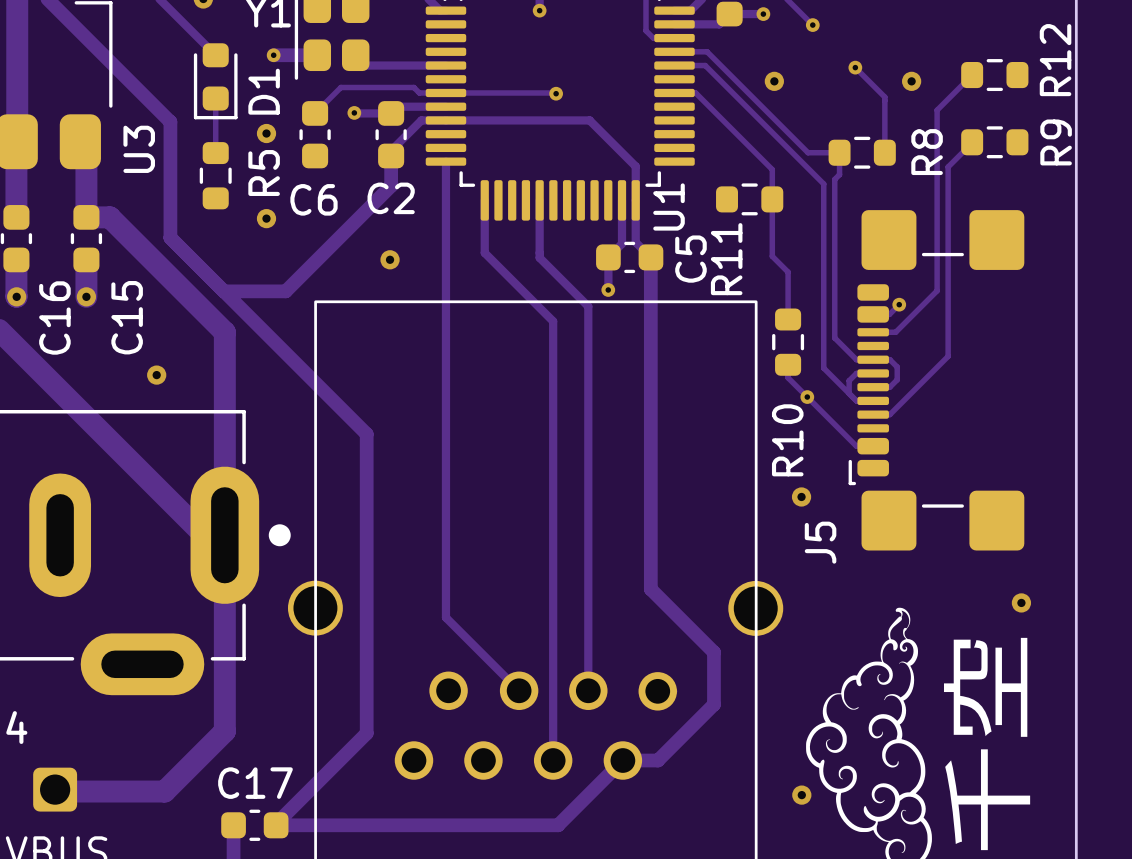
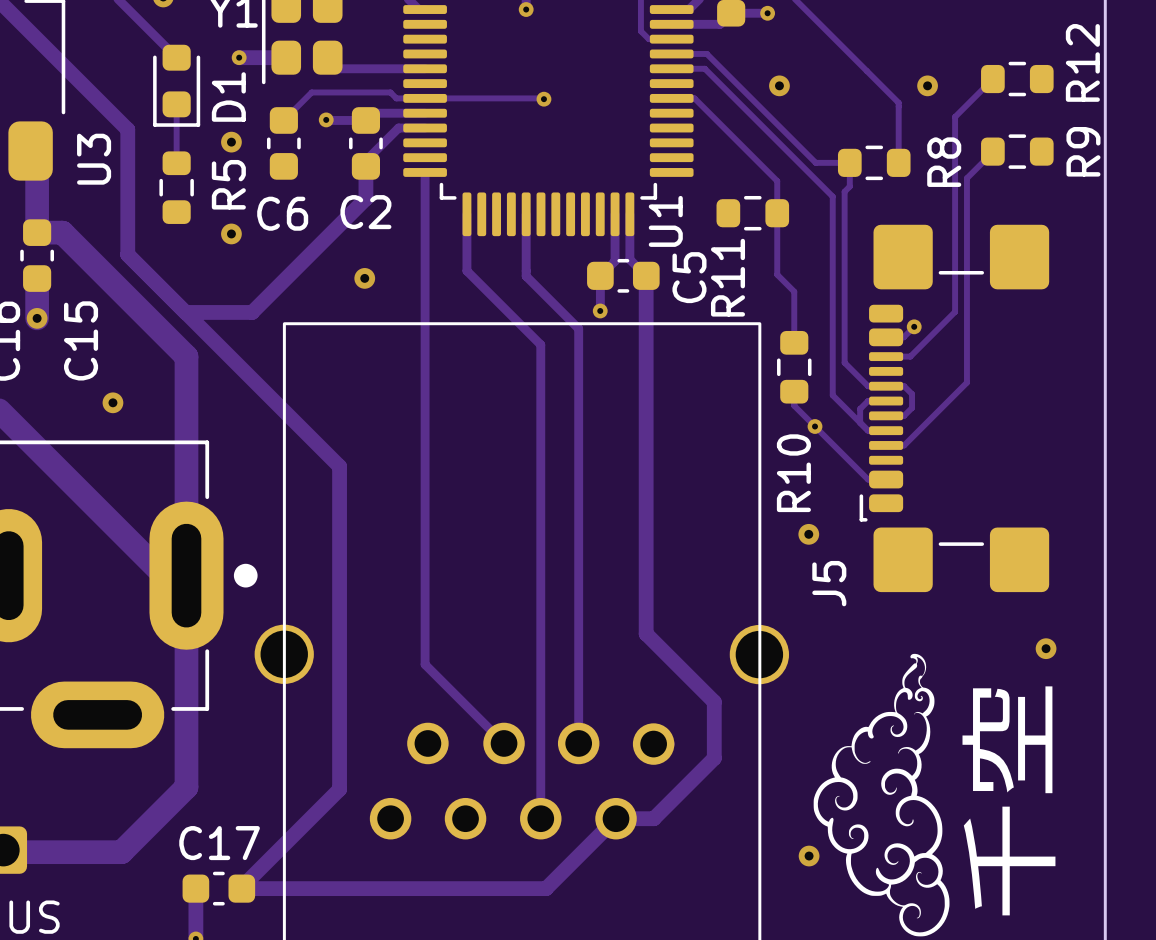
track: none -> (820, 25) (866, 71)
via: (812, 25) -> none
via: (855, 67) -> none
track: (445, 120) (589, 120) (635, 166) (635, 200) -> none

